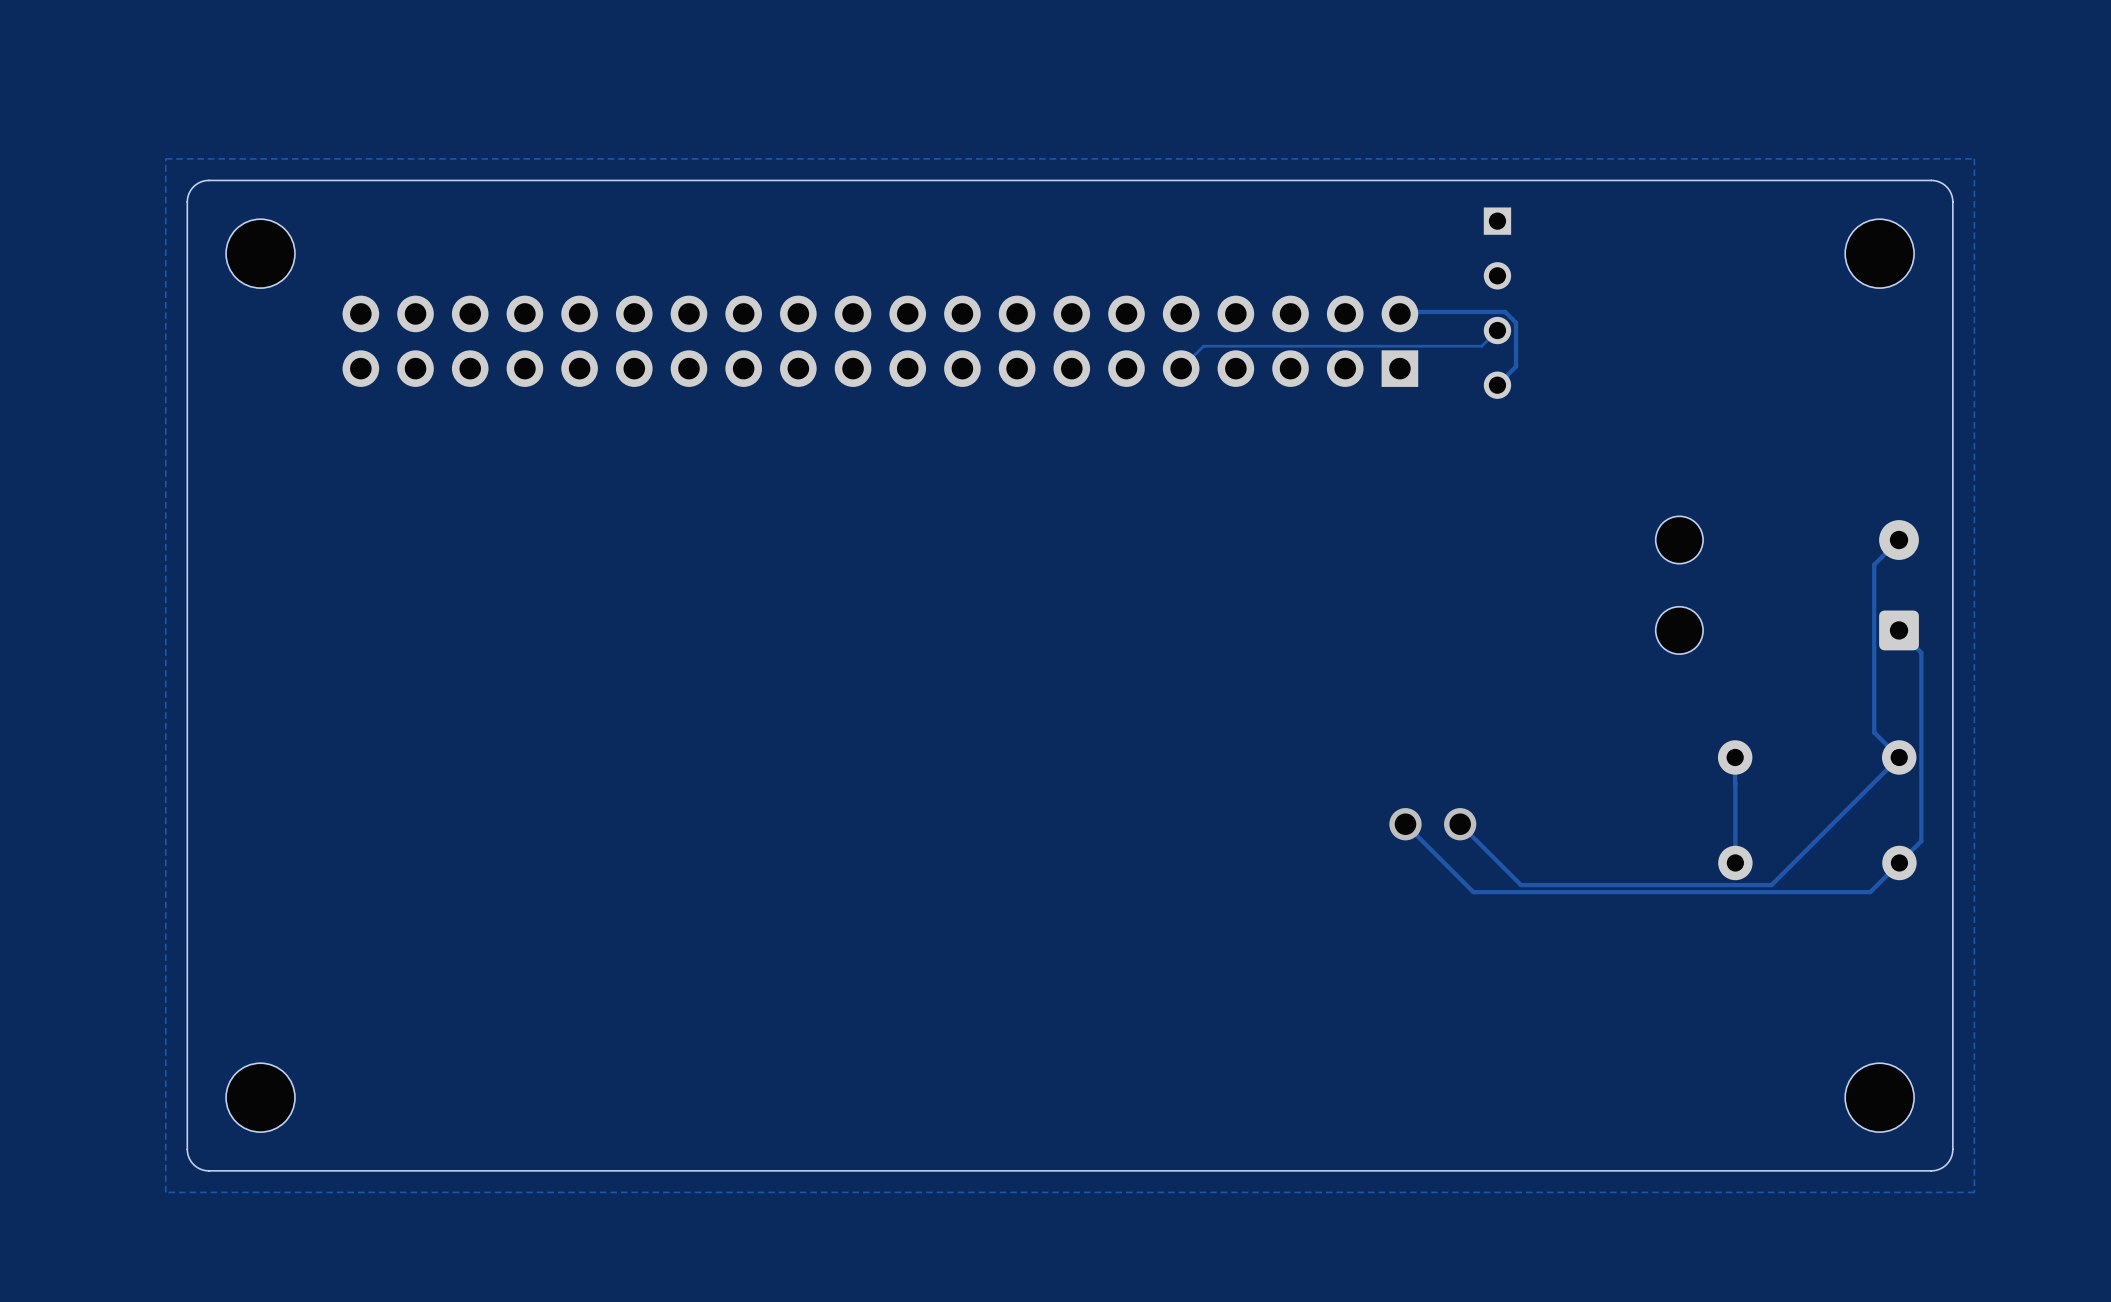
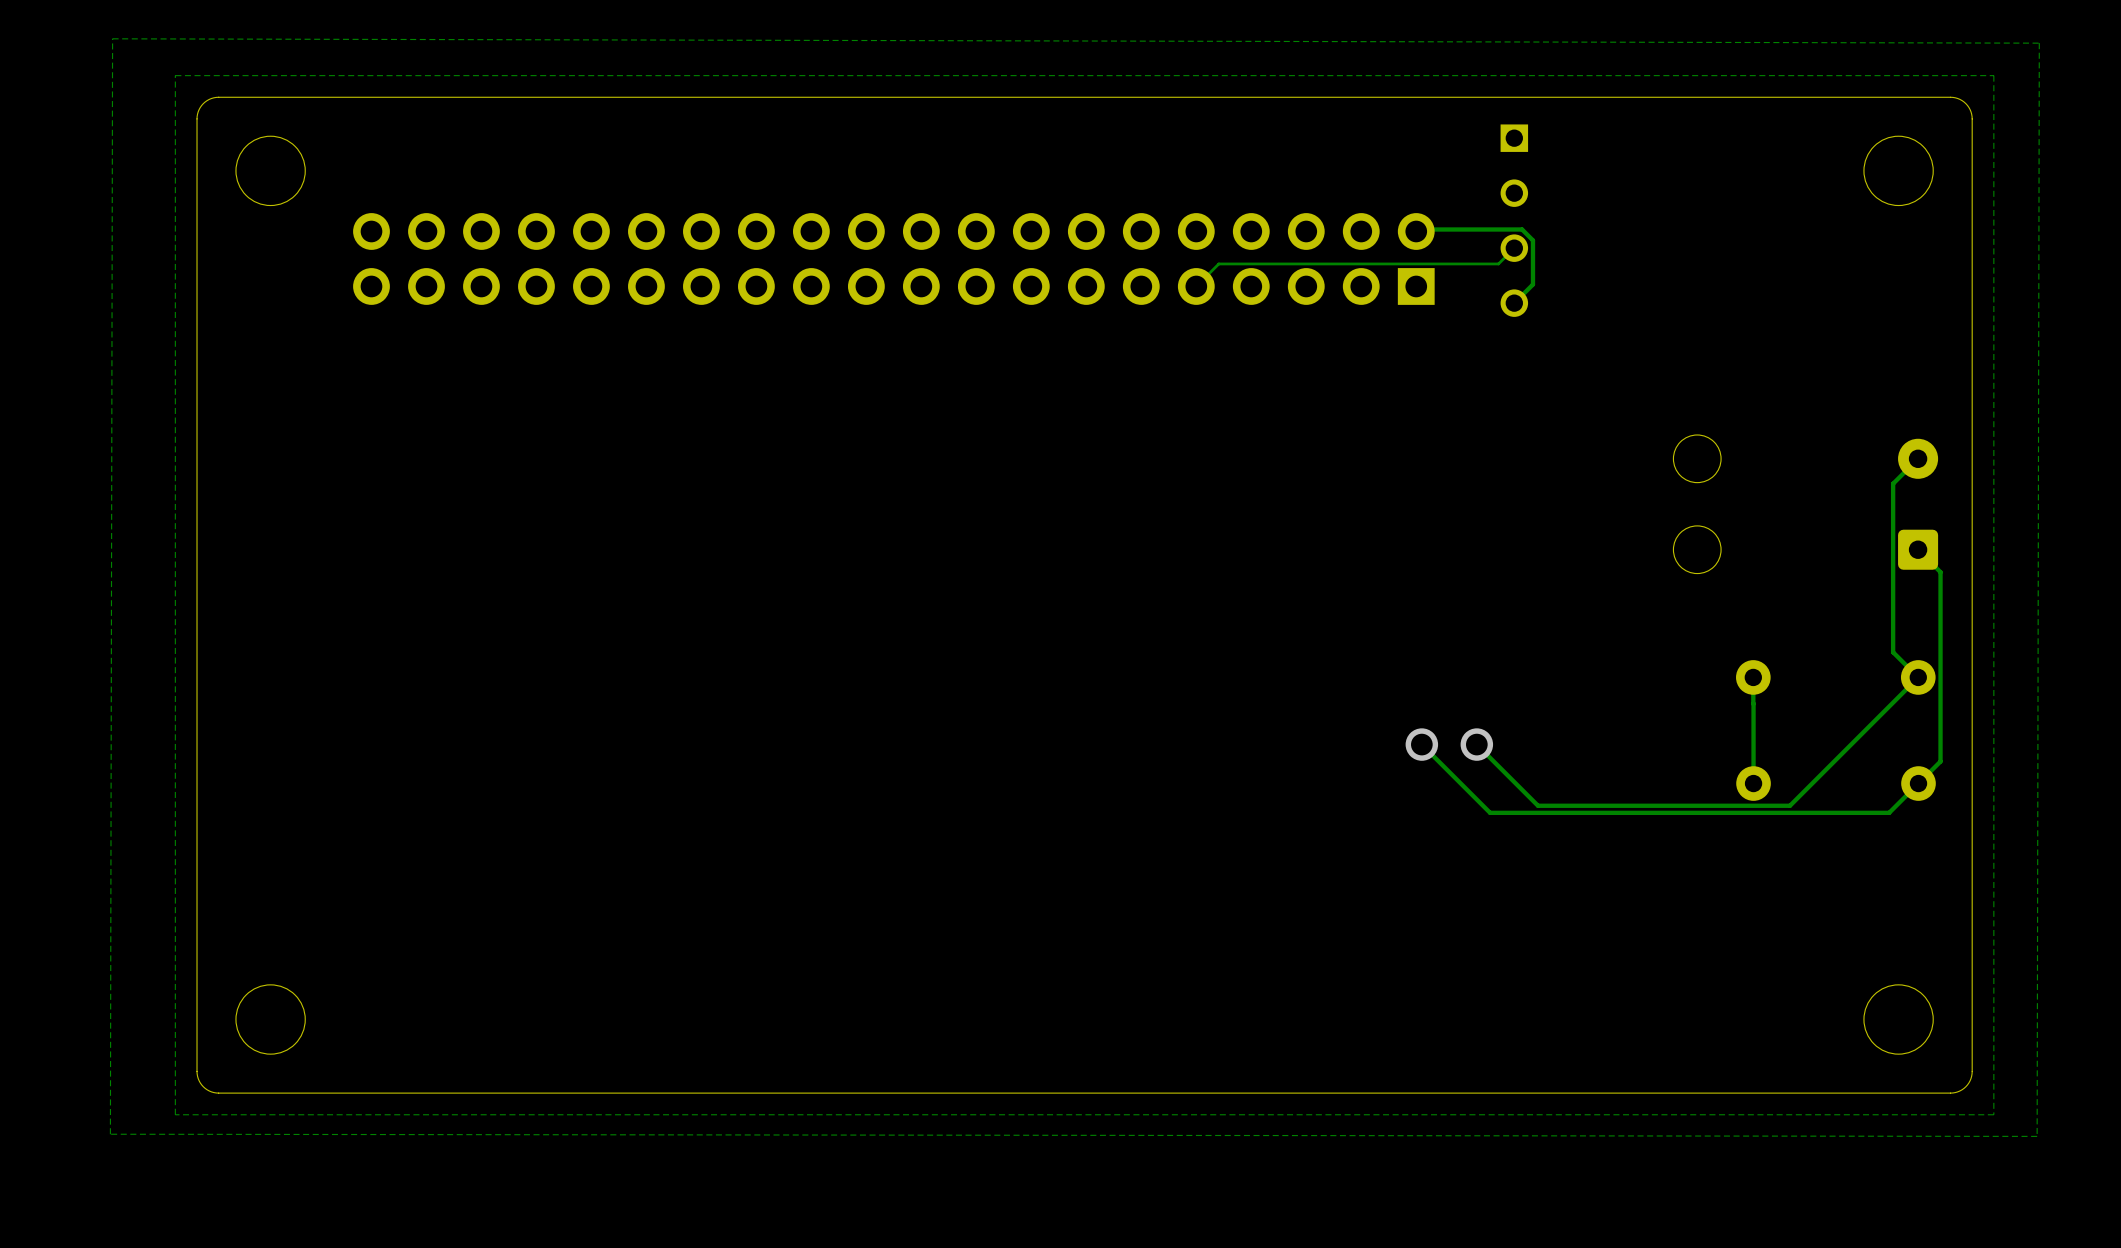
zone outline: none -> (112, 38) (110, 1134) (2037, 1136) (2039, 43) (112, 38)

